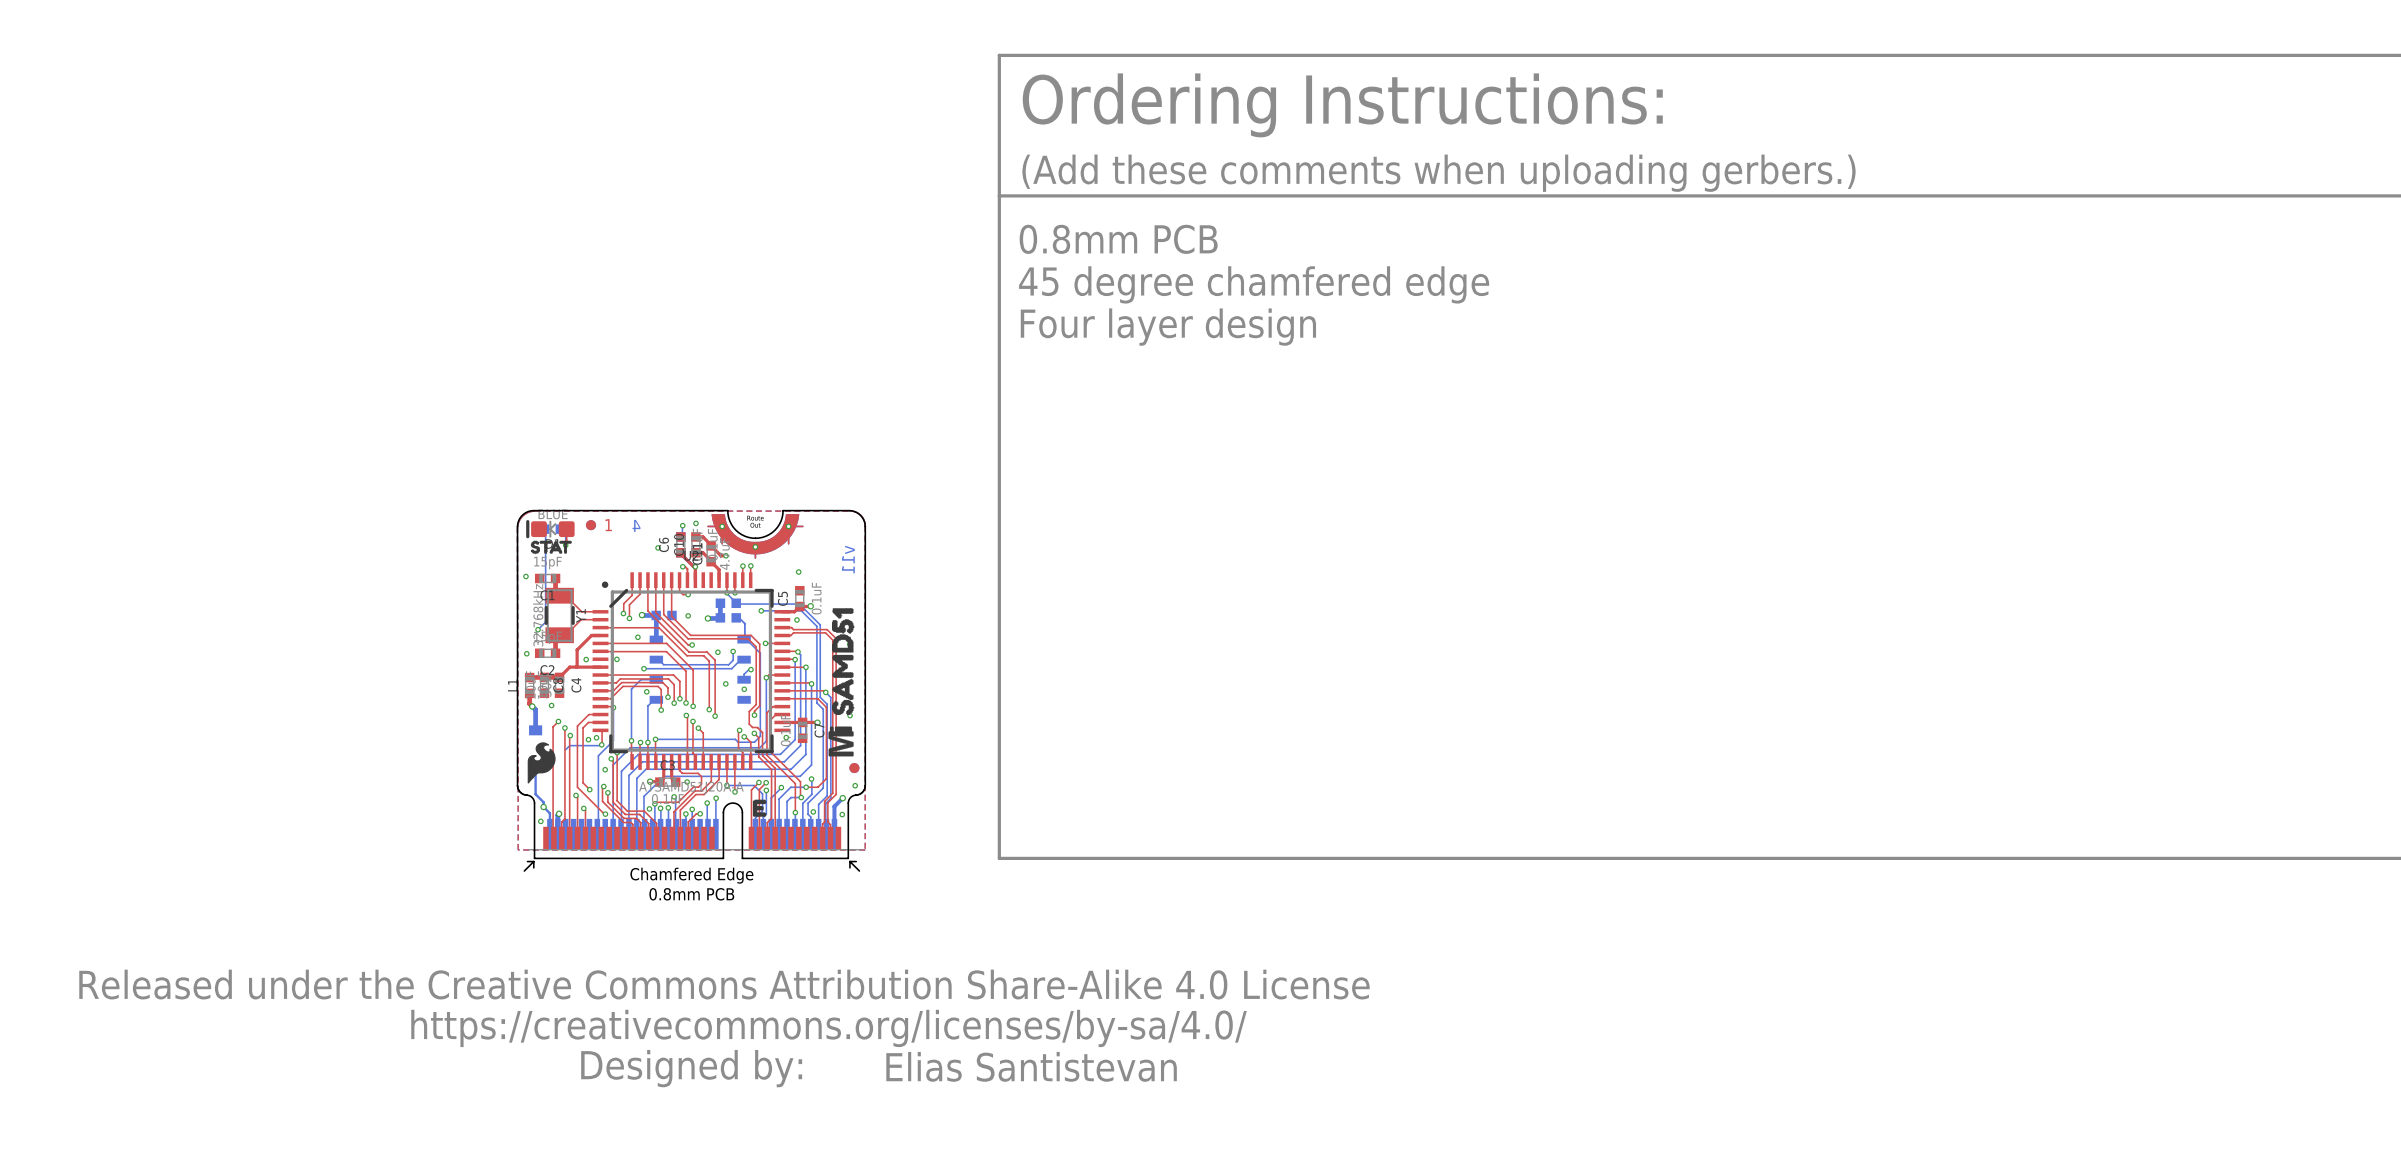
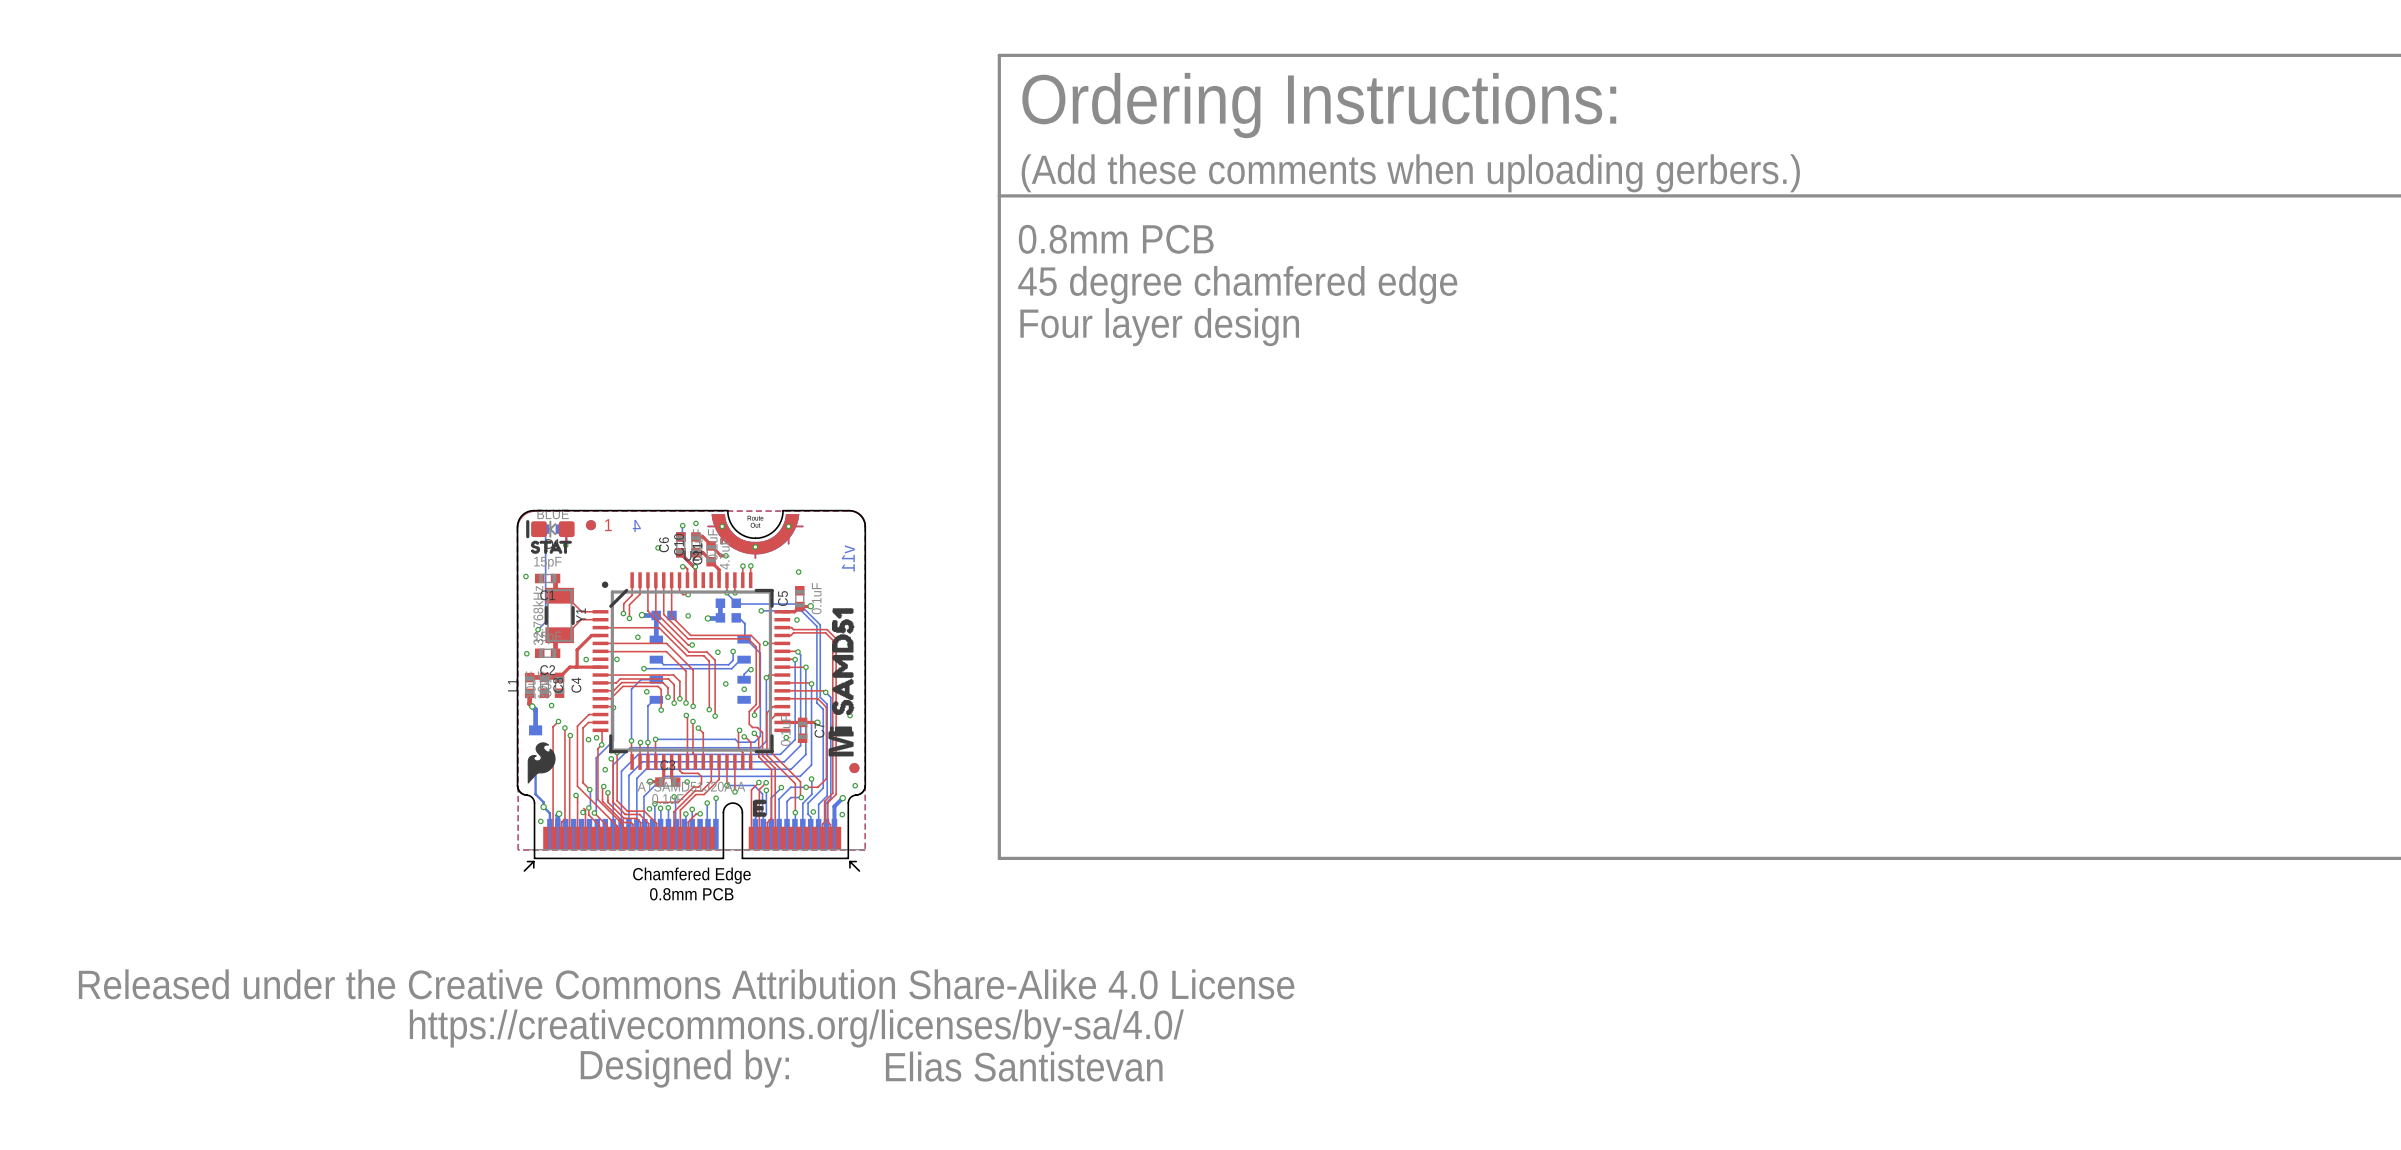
top track: none -> (601, 744) (597, 748) (597, 799) (623, 825) (625, 838)
bottom track: (601, 744) (569, 745) (565, 749) -> none
bottom track: (598, 755) (598, 833) -> (598, 755) (596, 757) (596, 811) (594, 813)
top track: (577, 786) (605, 814) -> (577, 786) (617, 825) (617, 838)
bottom track: none -> (590, 789) (588, 807)
top track: none -> (588, 807) (588, 815) (599, 825) (599, 836) (601, 838)
via: none -> (588, 807)
via: (583, 808) -> none
via: none -> (582, 812)
top track: none -> (594, 813) (607, 825) (607, 836) (609, 838)
via: none -> (594, 813)
via: (605, 814) -> none

